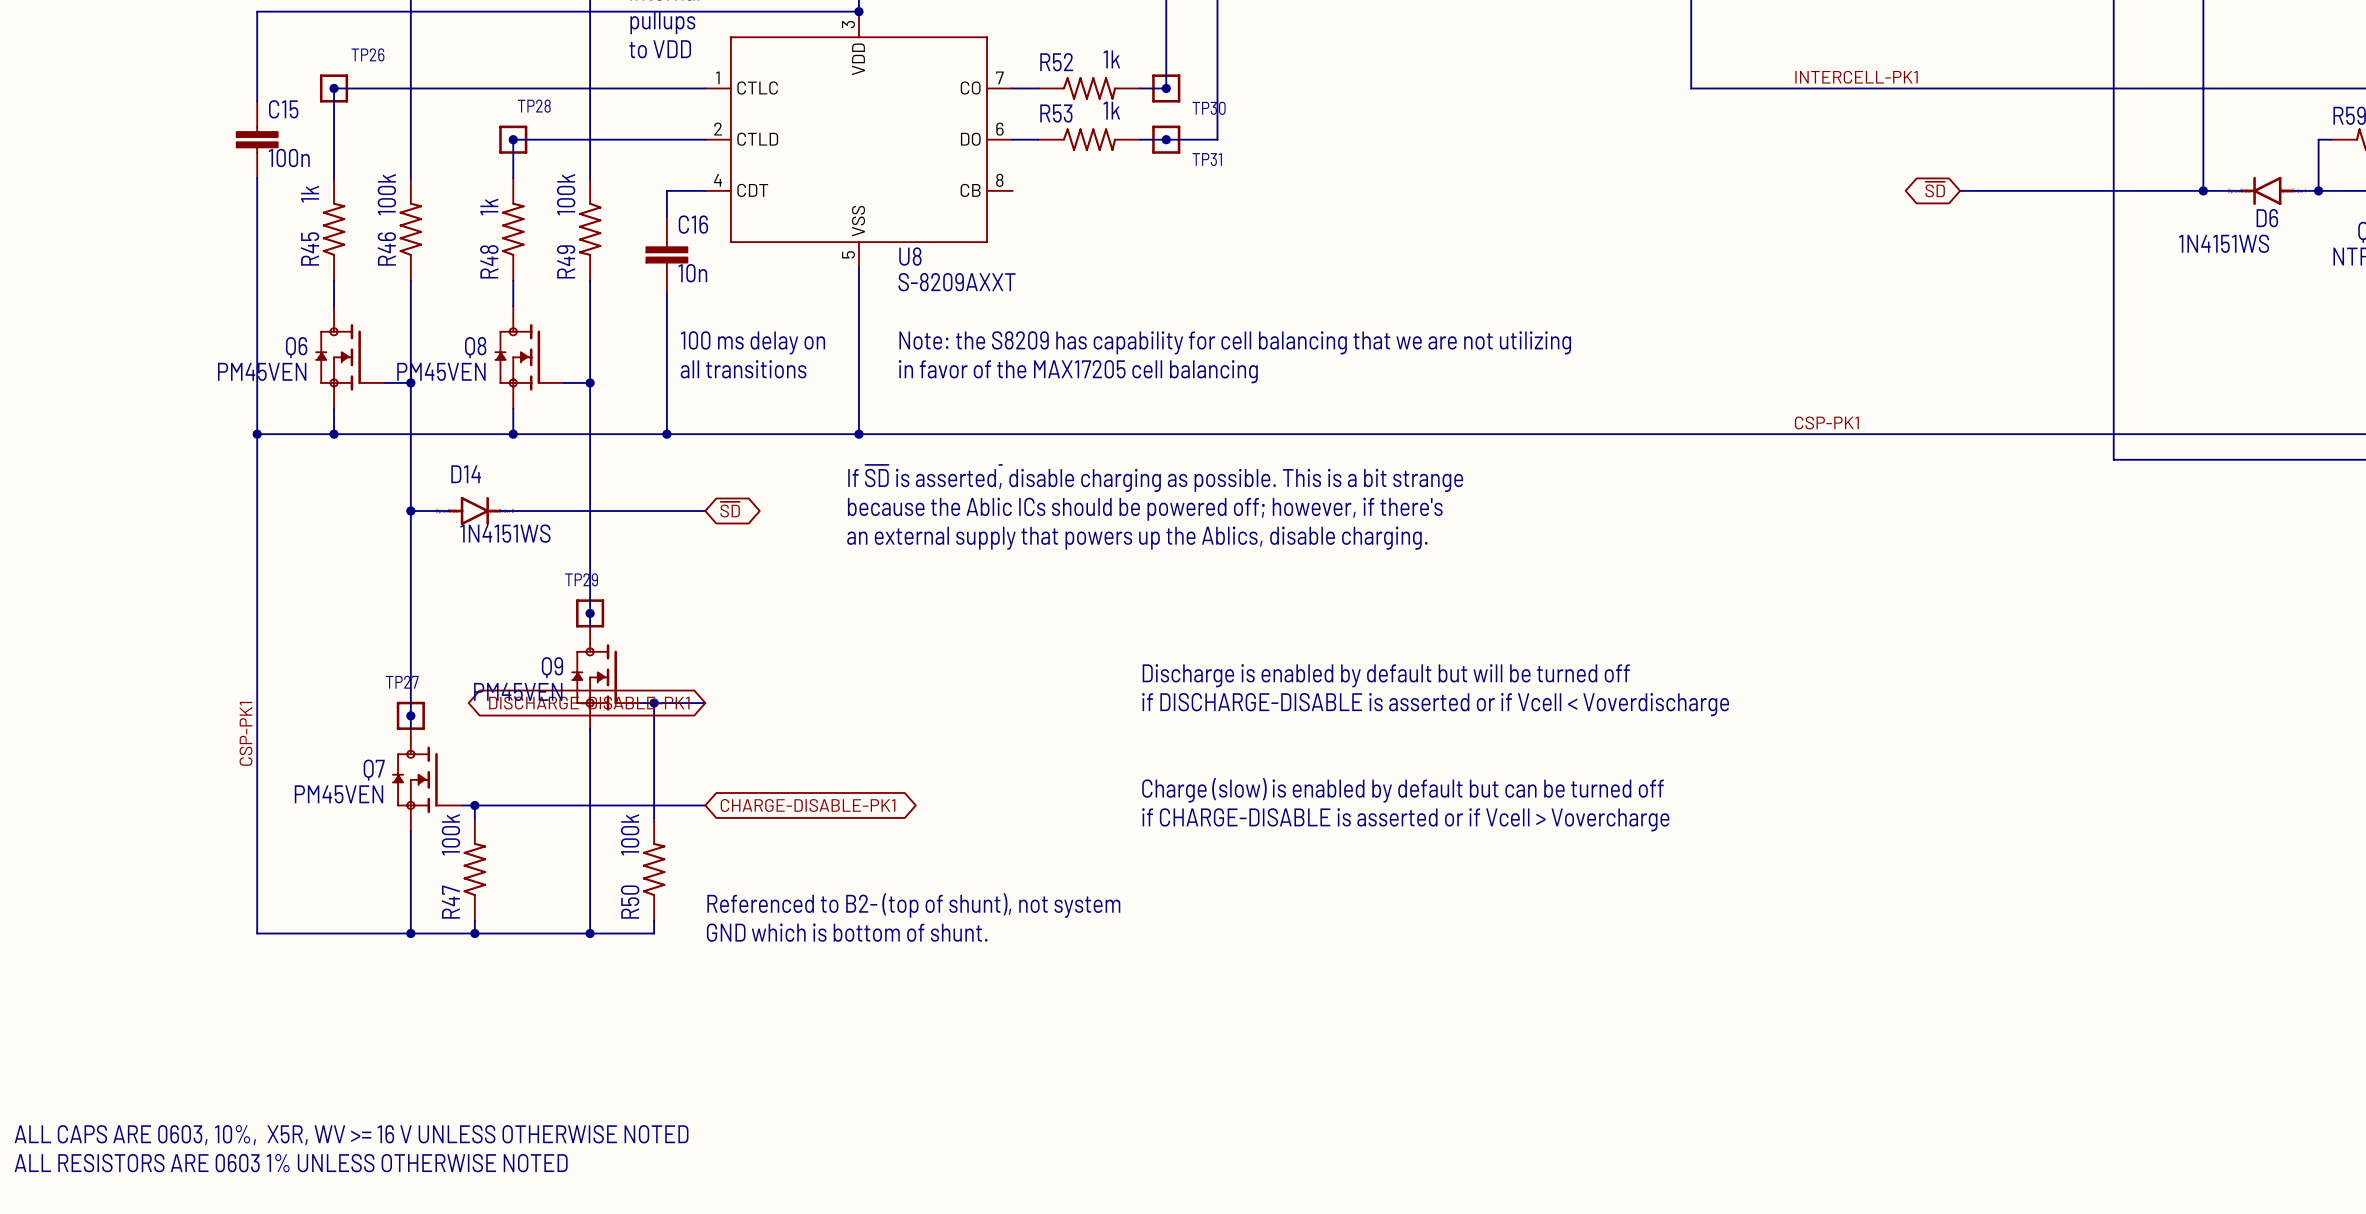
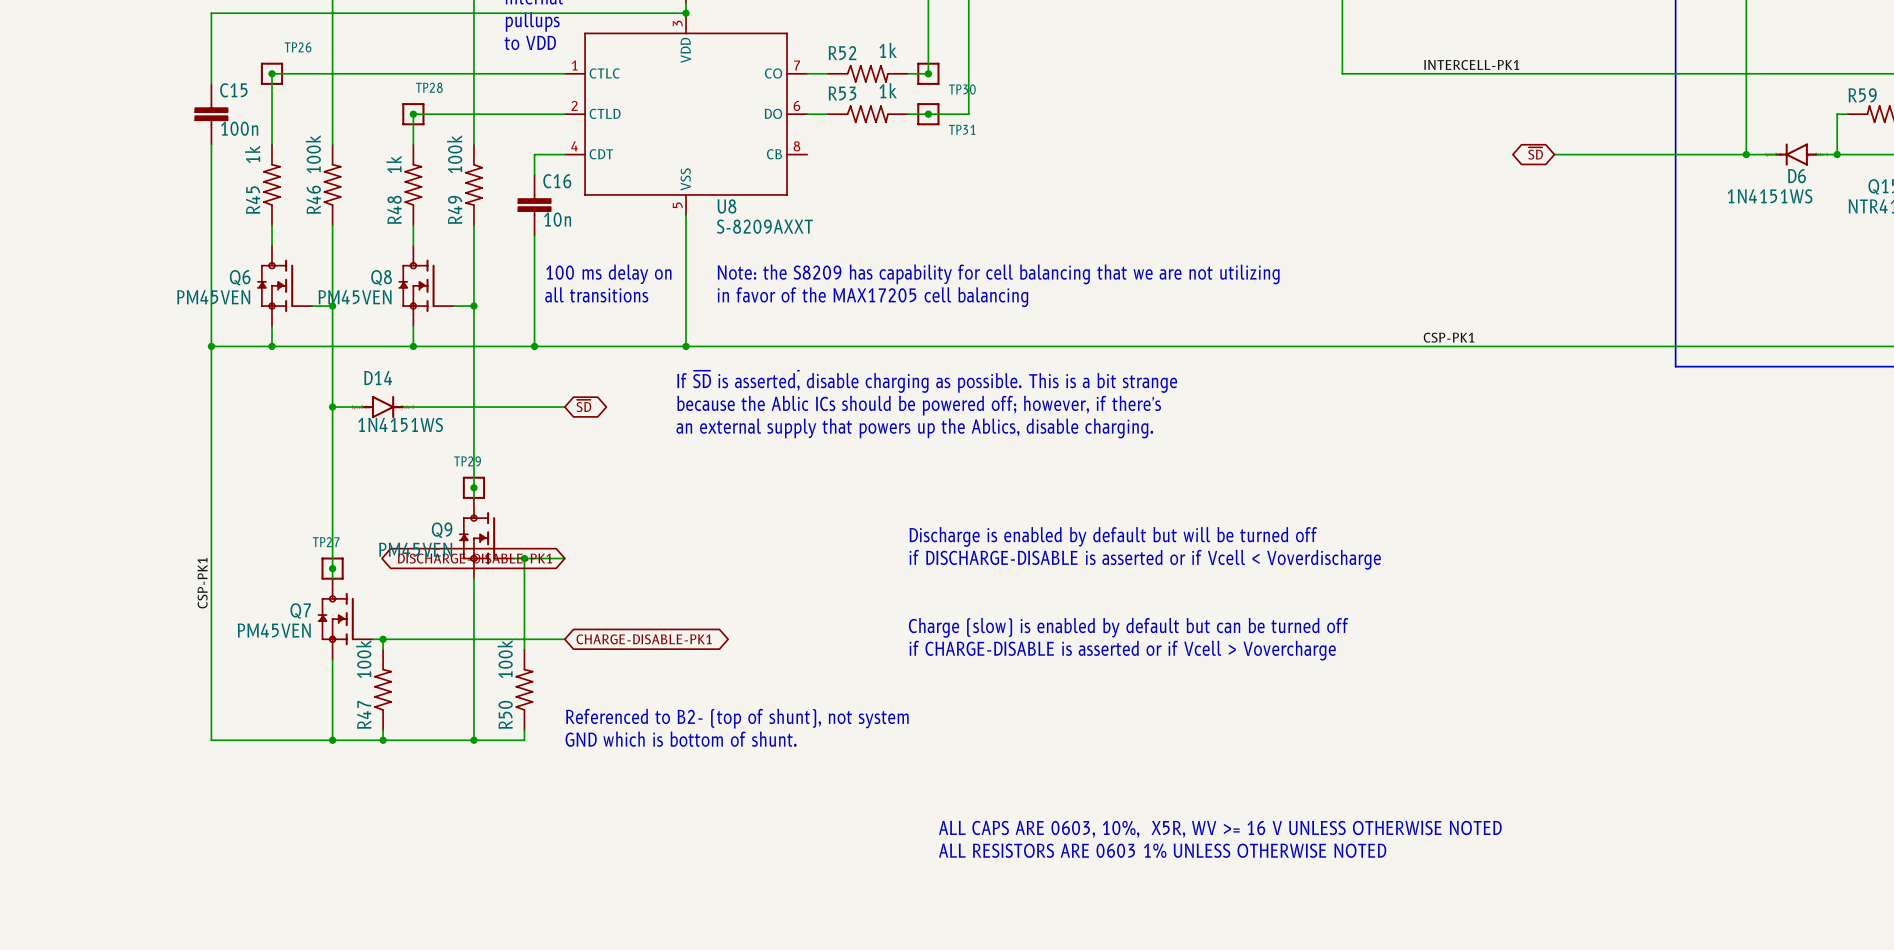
text: none -> ALL CAPS ARE 0603, 10%, X5R, WV >= 16 V UNLESS OTHERWISE NOTED (1220, 829)
text: none -> ALL RESISTORS ARE 0603 1% UNLESS OTHERWISE NOTED (1162, 850)
text: ALL CAPS ARE 0603, 10%, X5R, WV >= 16 V UNLESS OTHERWISE NOTED (351, 1135) -> none
text: ALL RESISTORS ARE 0603 1% UNLESS OTHERWISE NOTED (291, 1163) -> none

